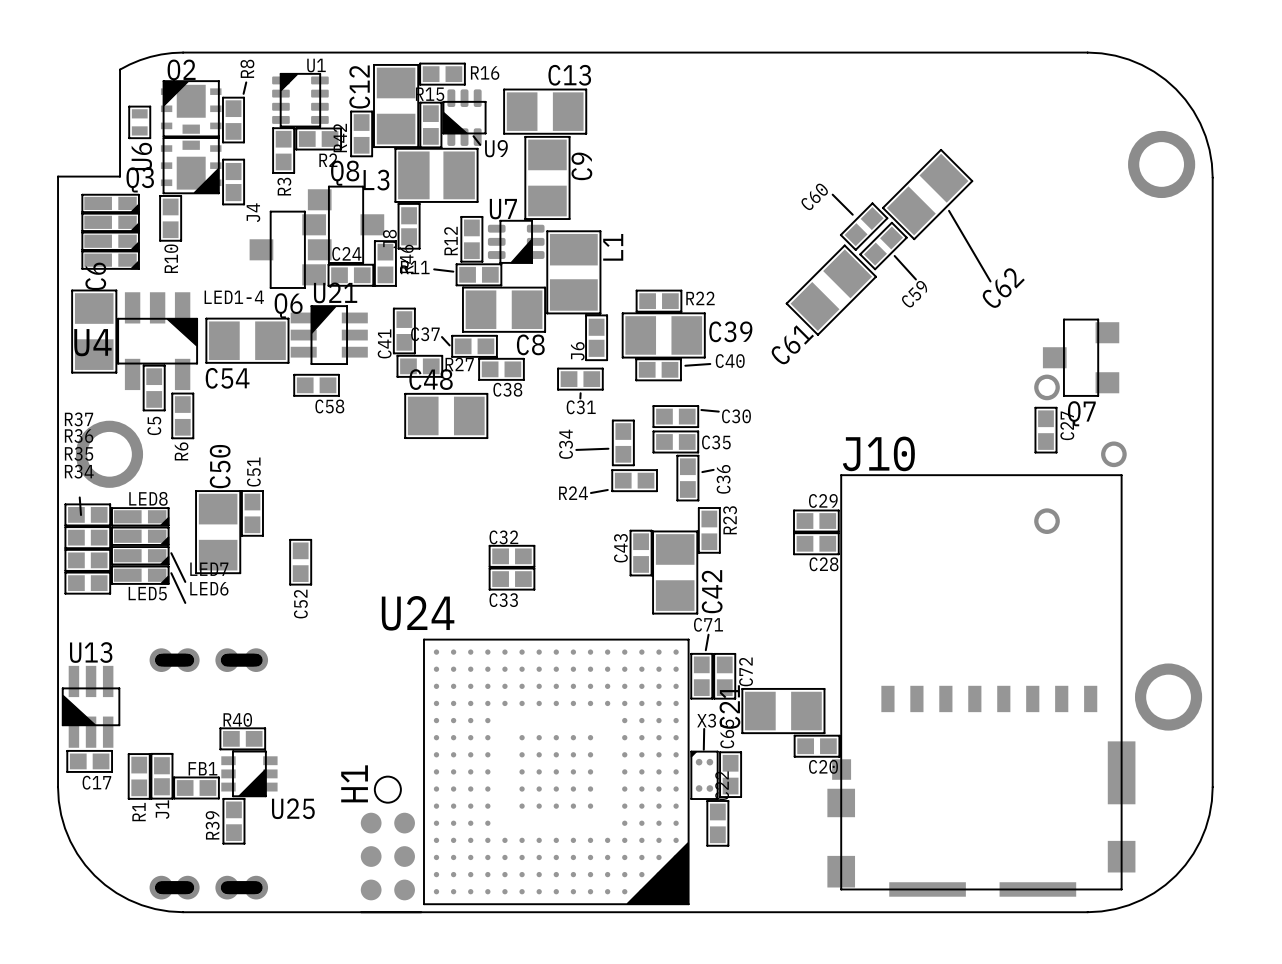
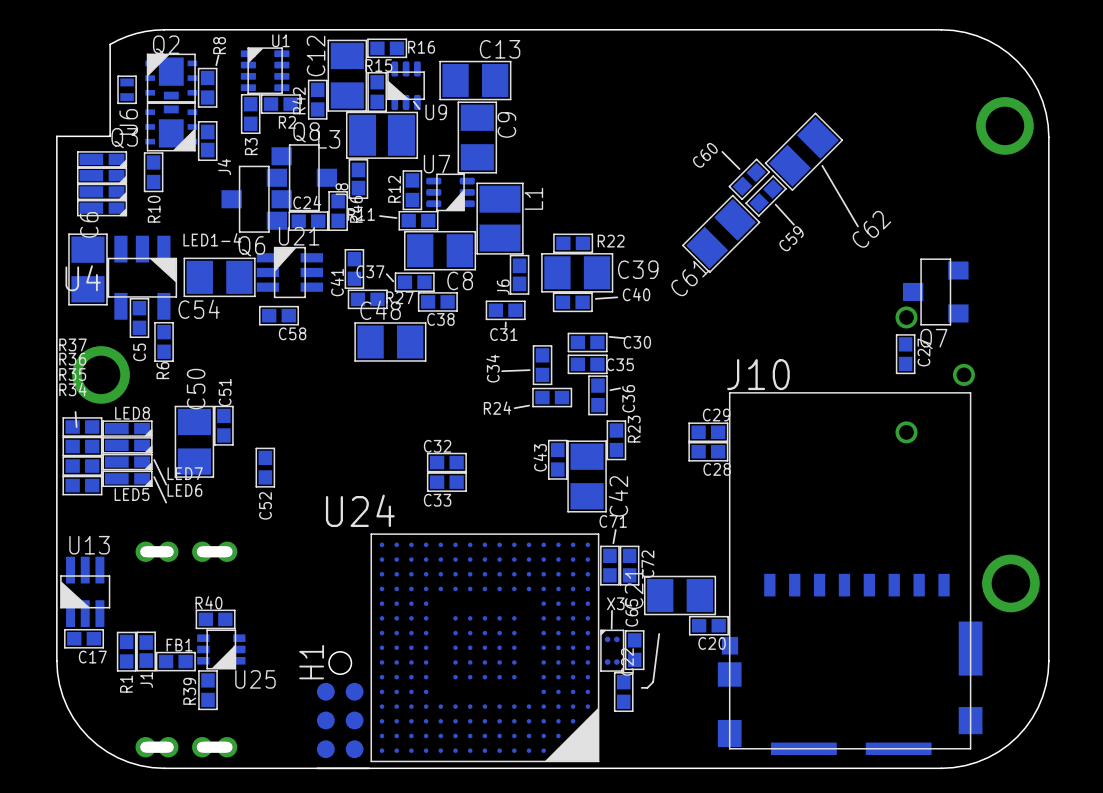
line: none -> (659, 633) (653, 682) (647, 687) (641, 687)

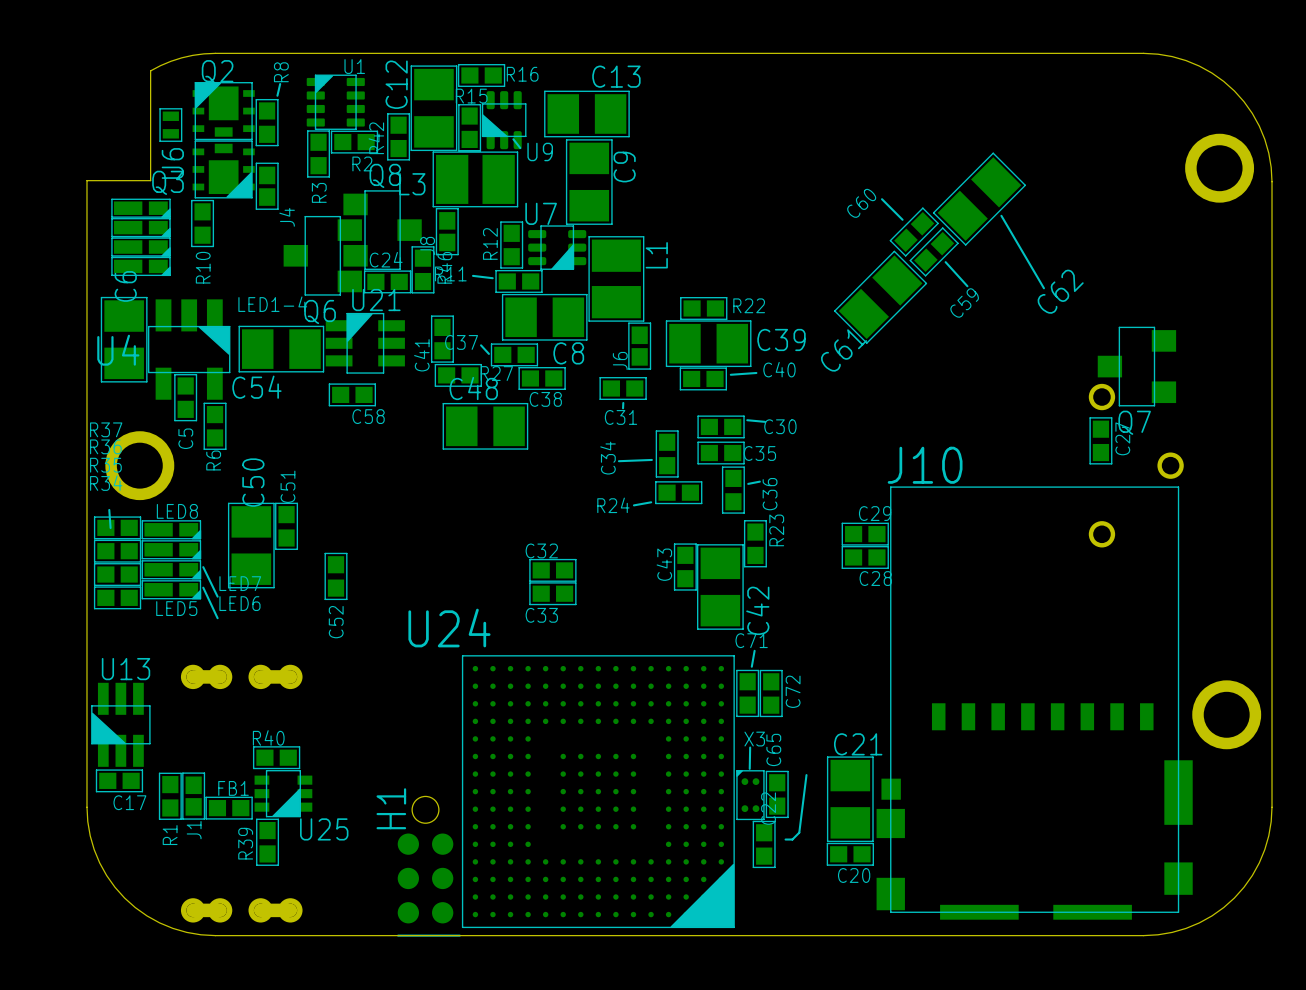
C21 rotation: 0° (680, 595) -> 90° clockwise (850, 799)
C21 position: (680, 595) -> (850, 799)
C20 position: (708, 625) -> (850, 854)

